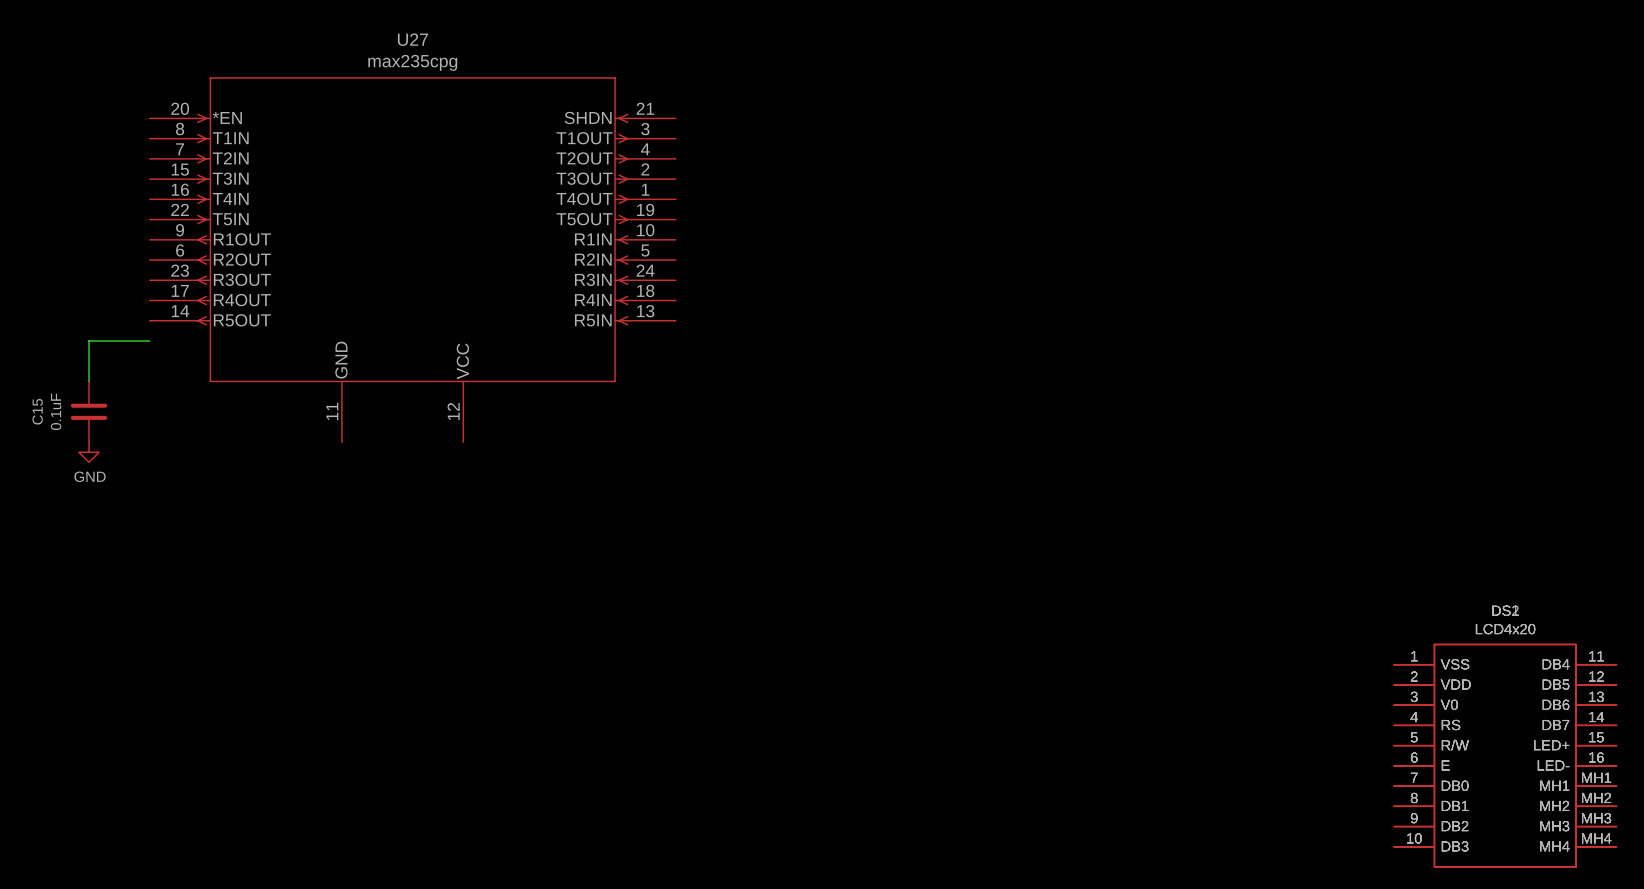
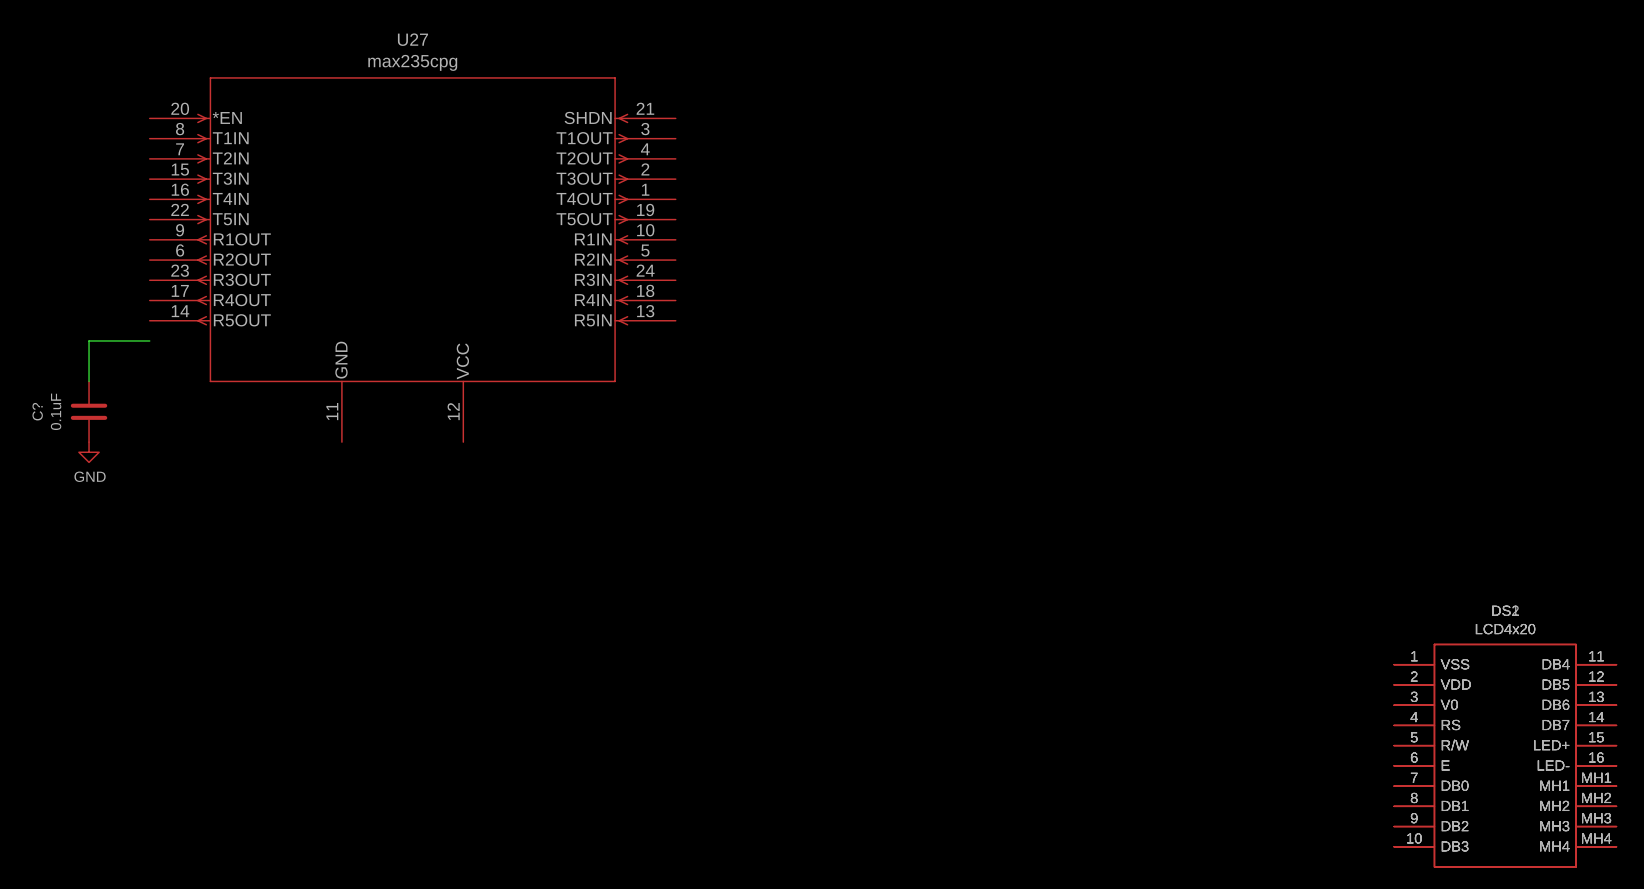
C15 name: C15 (37, 411) -> C? (37, 411)

